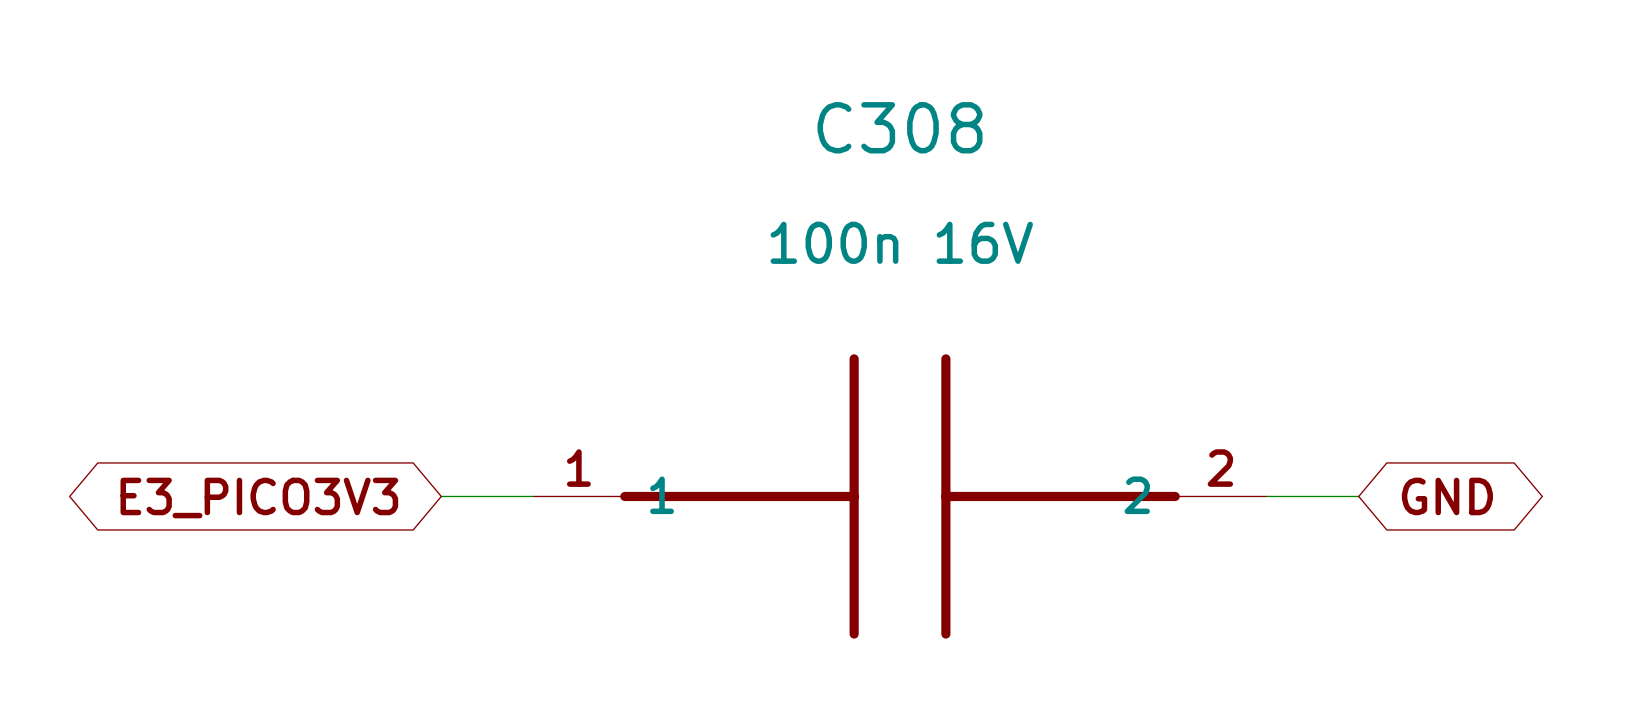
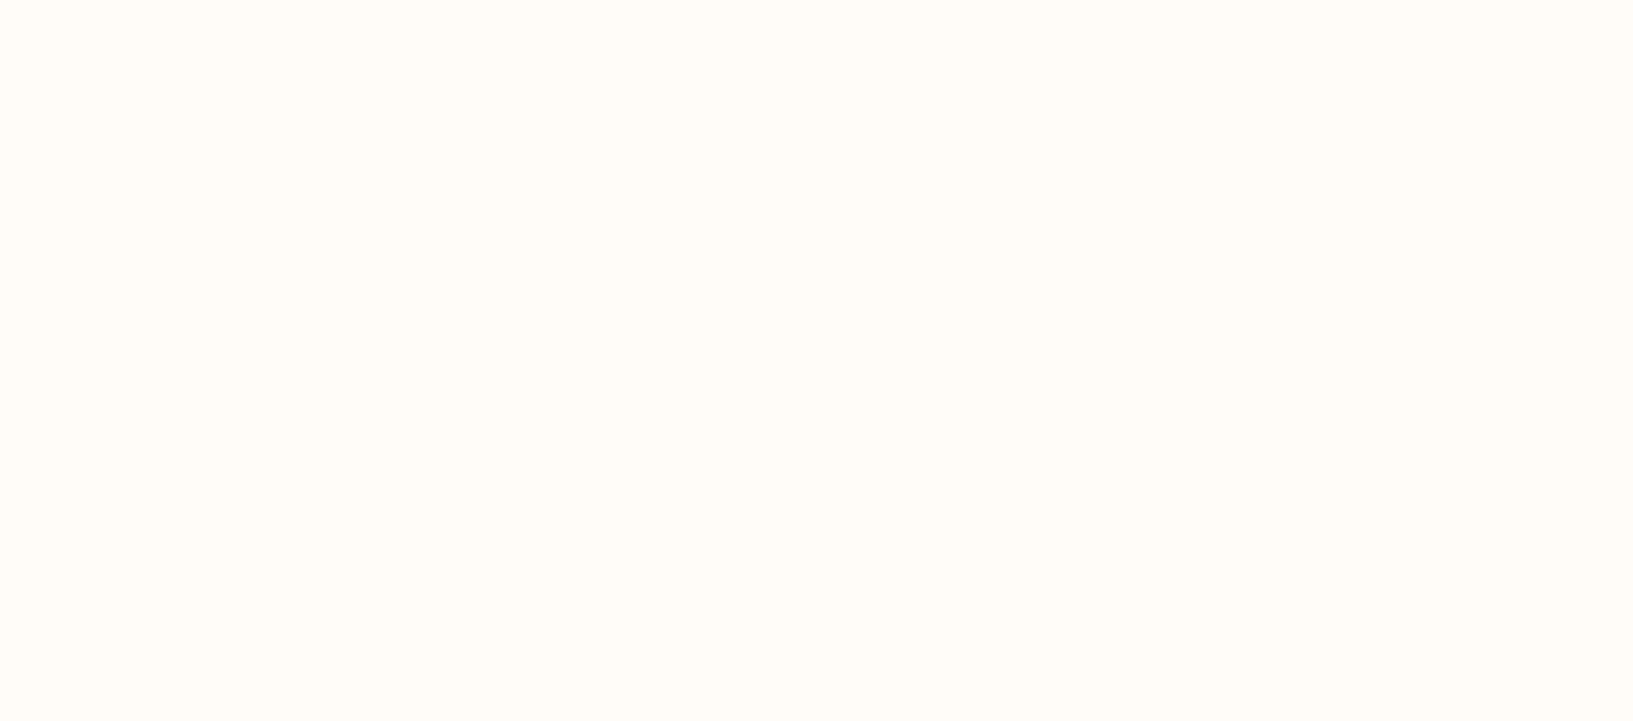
wire: (441, 496) (533, 496) -> none
C308: 100n 16V (900, 496) -> none
wire: (1266, 496) (1358, 496) -> none
global label: GND (1447, 496) -> none
global label: E3_PICO3V3 (259, 498) -> none

